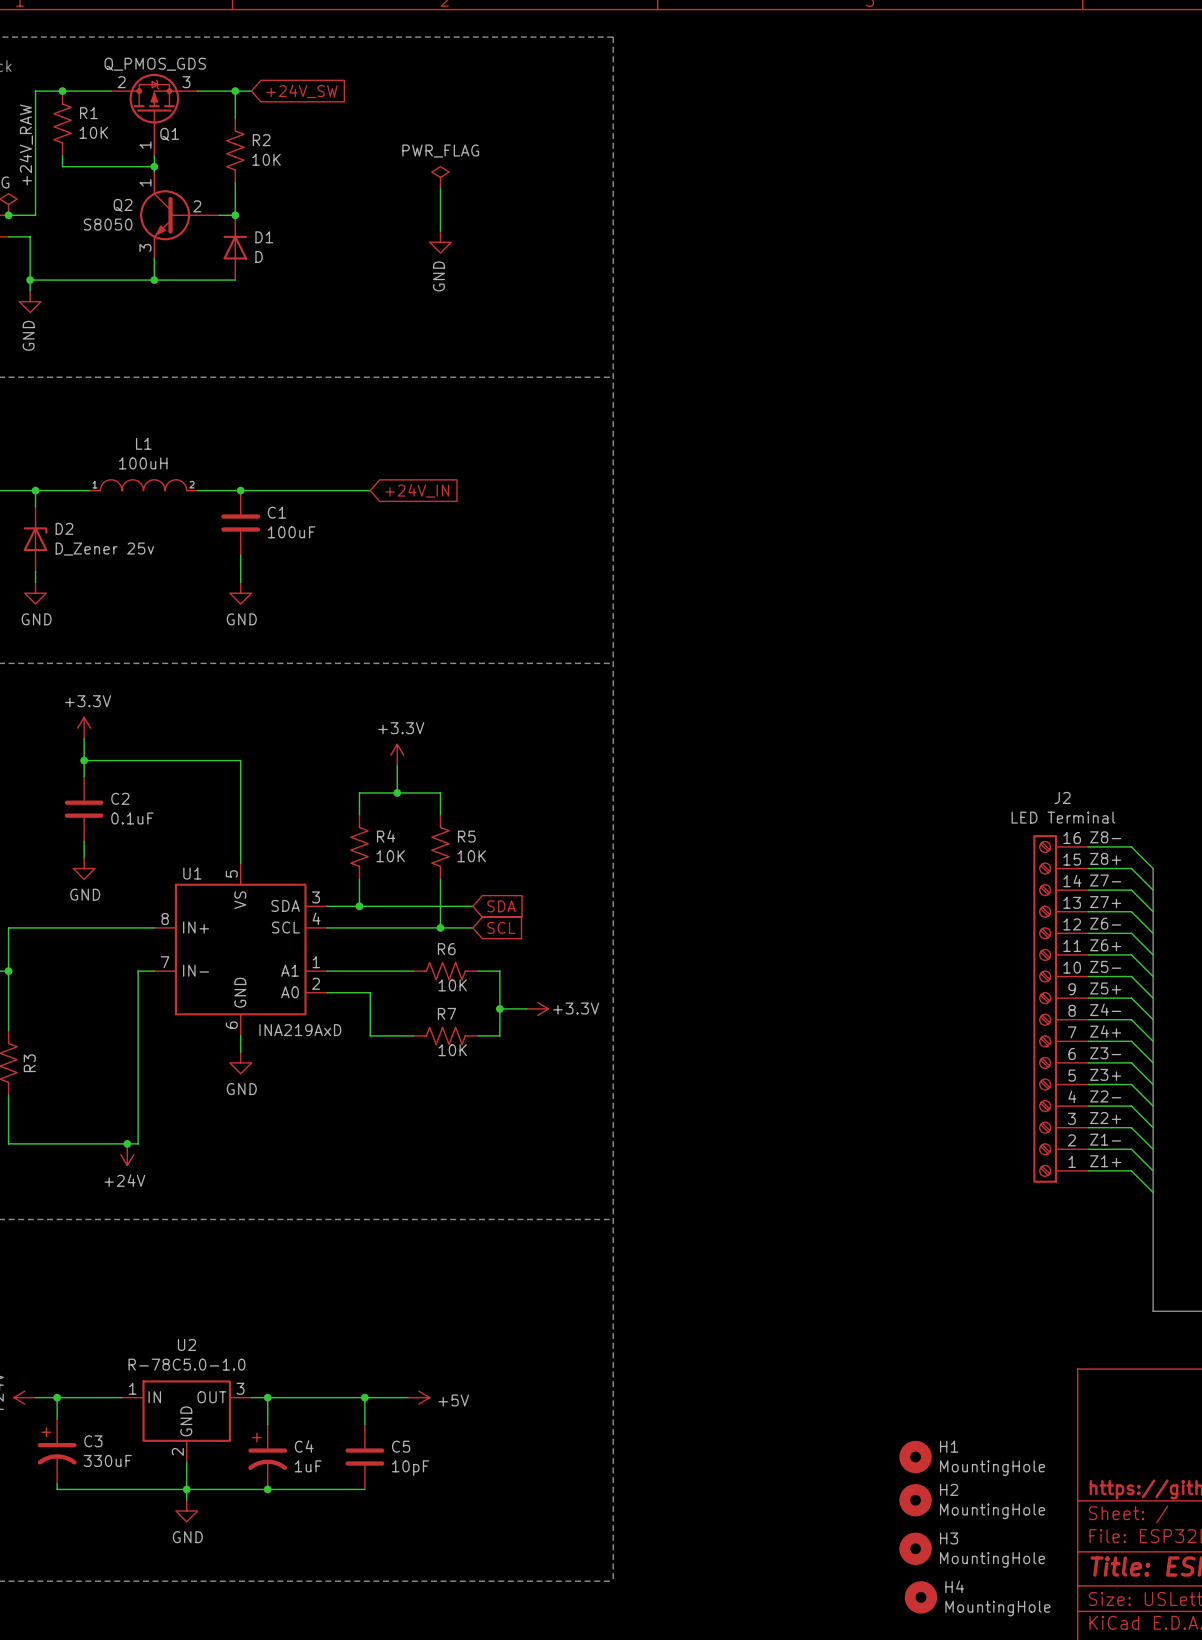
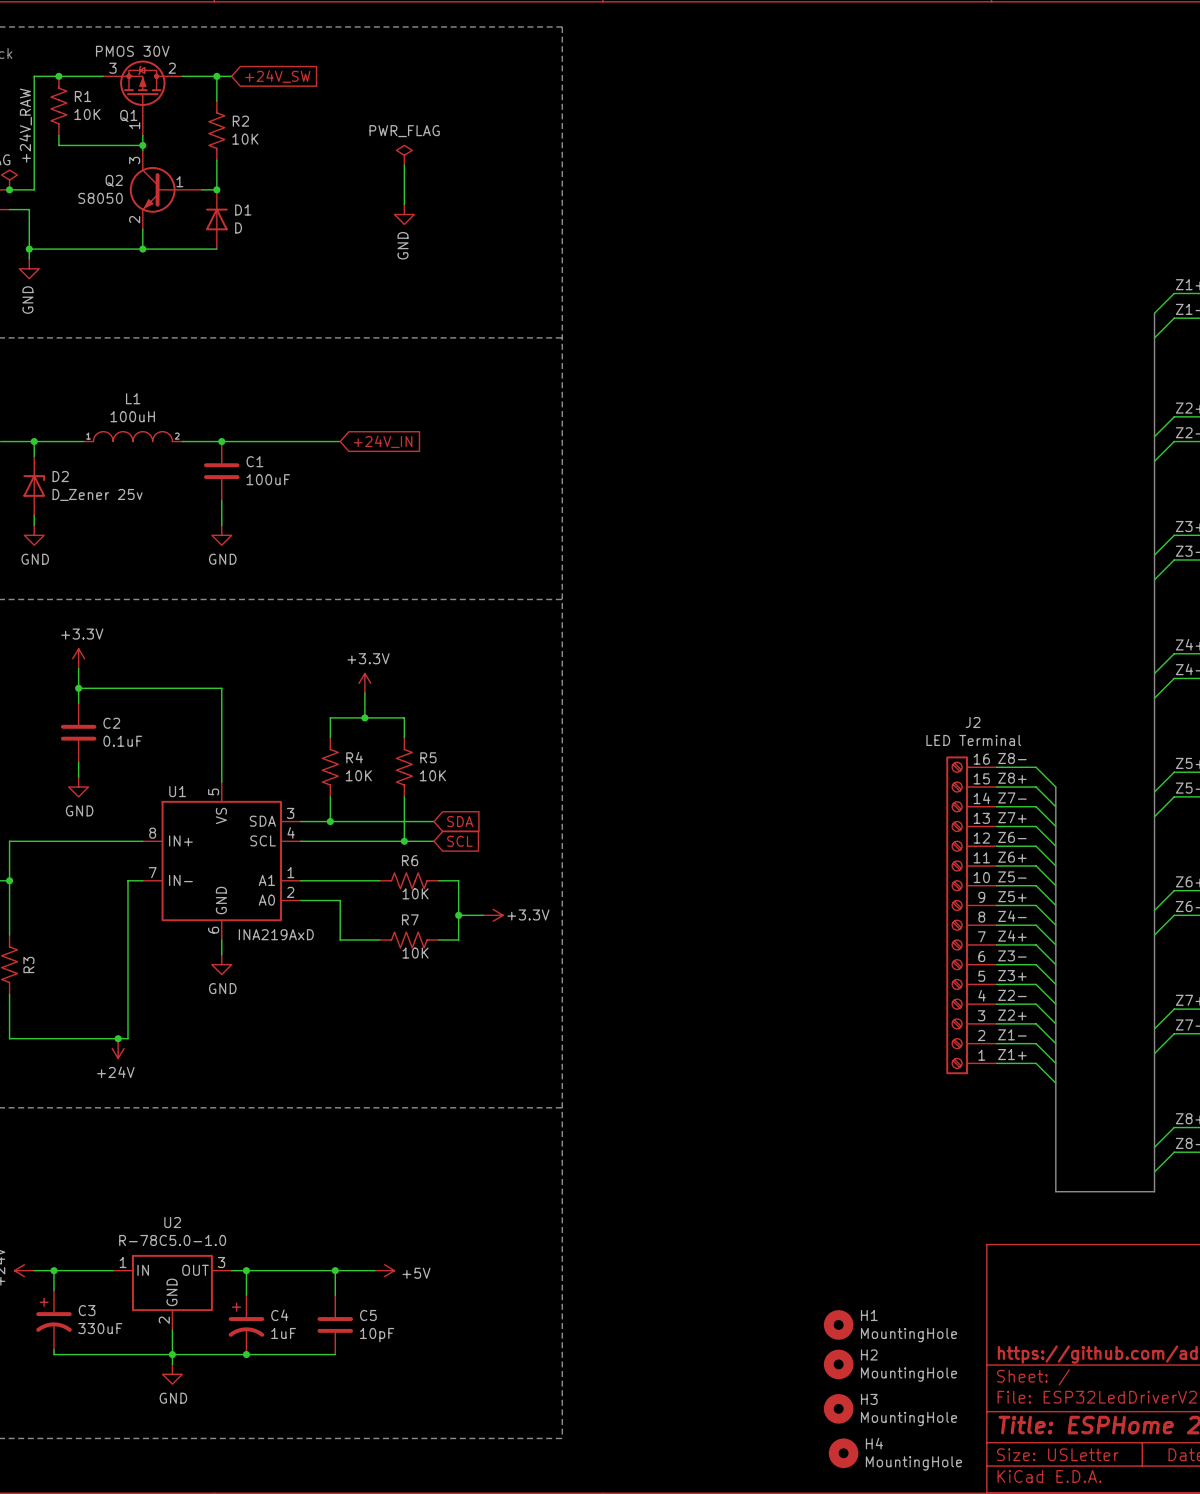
Q1 value: Q_PMOS_GDS (155, 64) -> PMOS 30V (132, 51)
Q1 flip: as is (154, 104) -> left-right (142, 88)
Q2 symbol: [140, 172, 220, 259] -> [129, 150, 203, 230]

